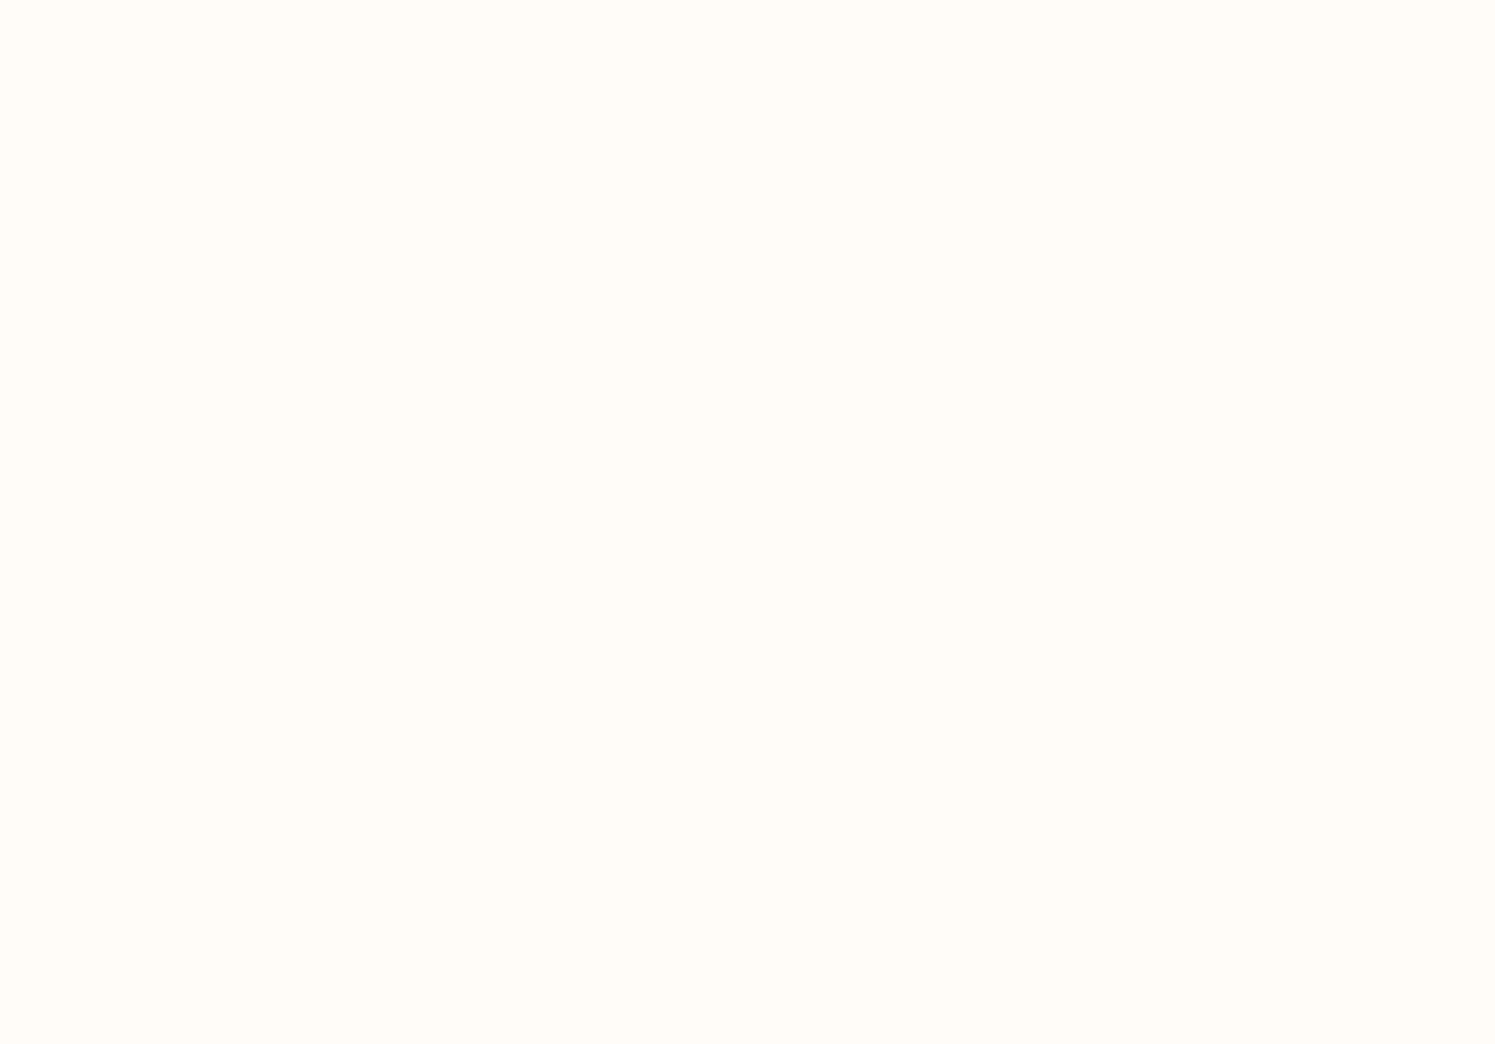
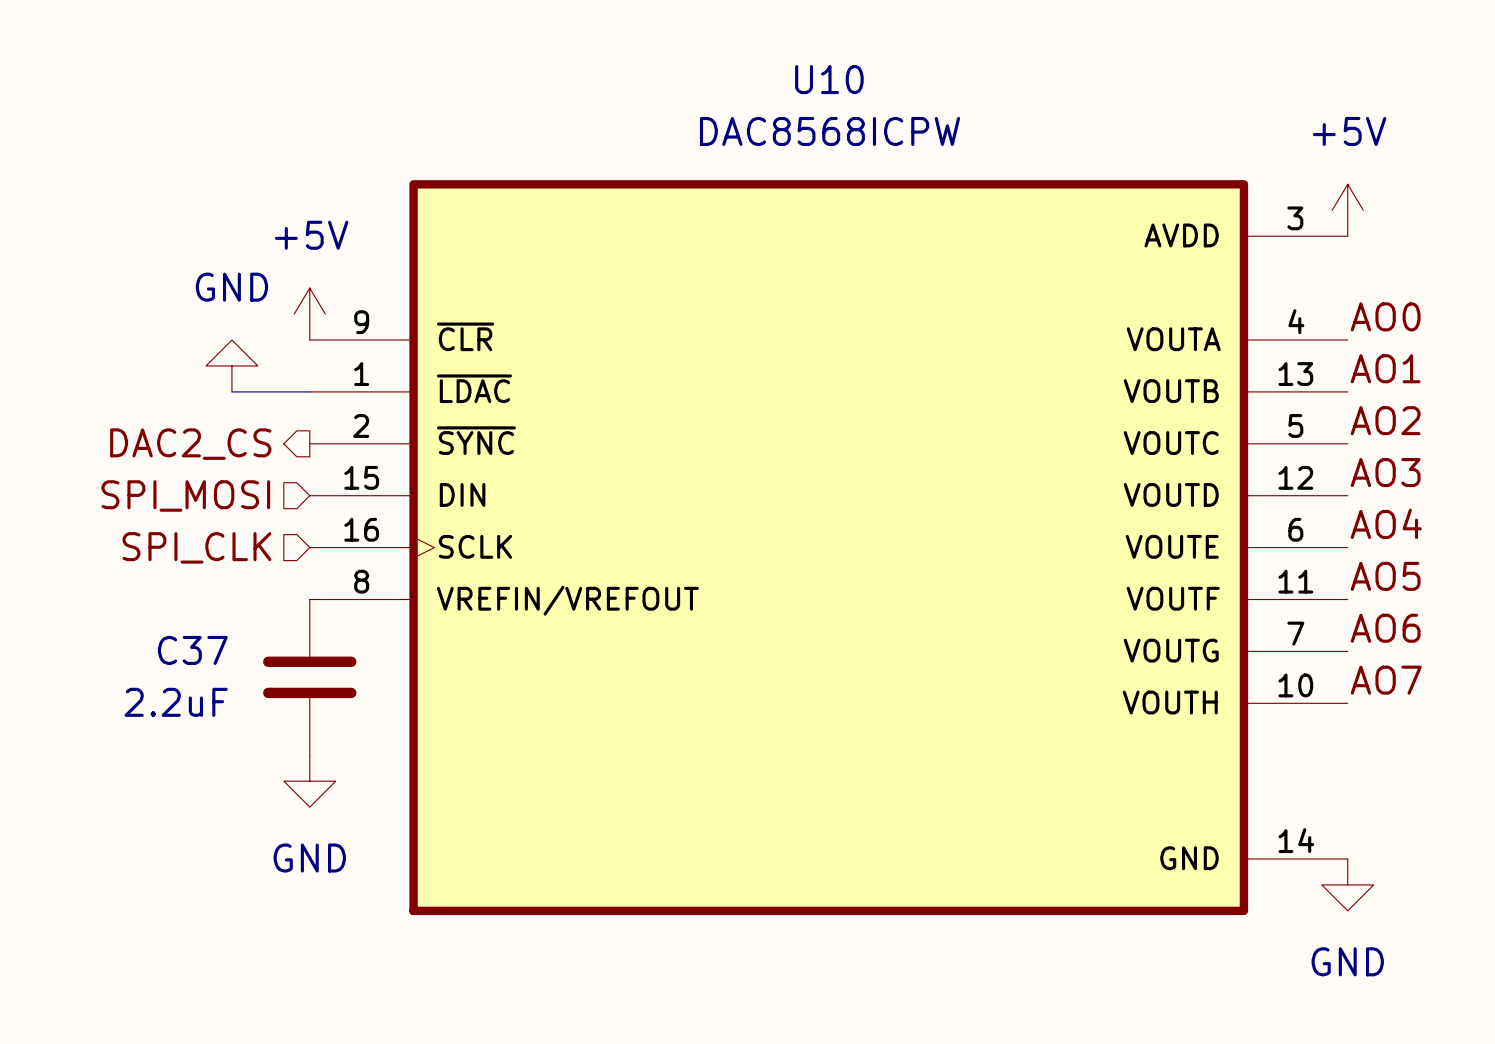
power symbol: none -> +5V (1347, 210)
power symbol: none -> +5V (309, 314)
label: none -> AO0 (1385, 316)
power symbol: none -> GND (231, 365)
label: none -> AO1 (1385, 368)
wire: none -> (231, 391) (309, 391)
label: none -> AO2 (1385, 420)
hierarchical label: none -> DAC2_CS (190, 444)
label: none -> AO3 (1385, 472)
hierarchical label: none -> SPI_MOSI (185, 495)
label: none -> AO4 (1386, 523)
hierarchical label: none -> SPI_CLK (196, 547)
U10: none -> DAC8568ICPW (828, 547)
label: none -> AO5 (1385, 576)
label: none -> AO6 (1385, 628)
C37: none -> 2.2uF (309, 677)
label: none -> AO7 (1386, 680)
power symbol: none -> GND (309, 781)
power symbol: none -> GND (1347, 884)

